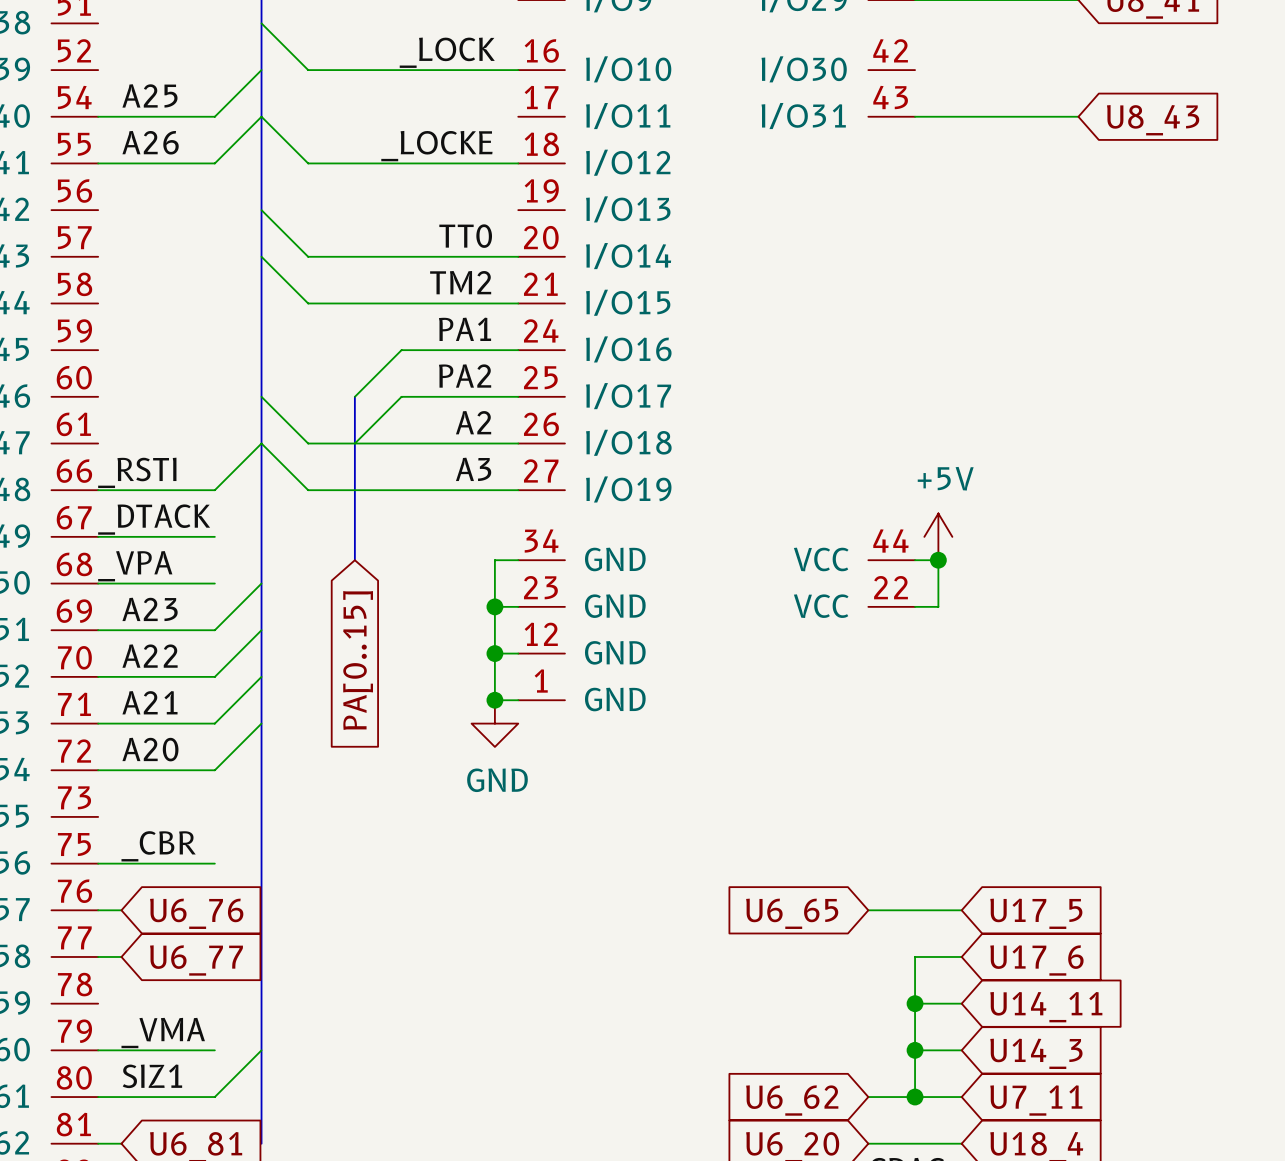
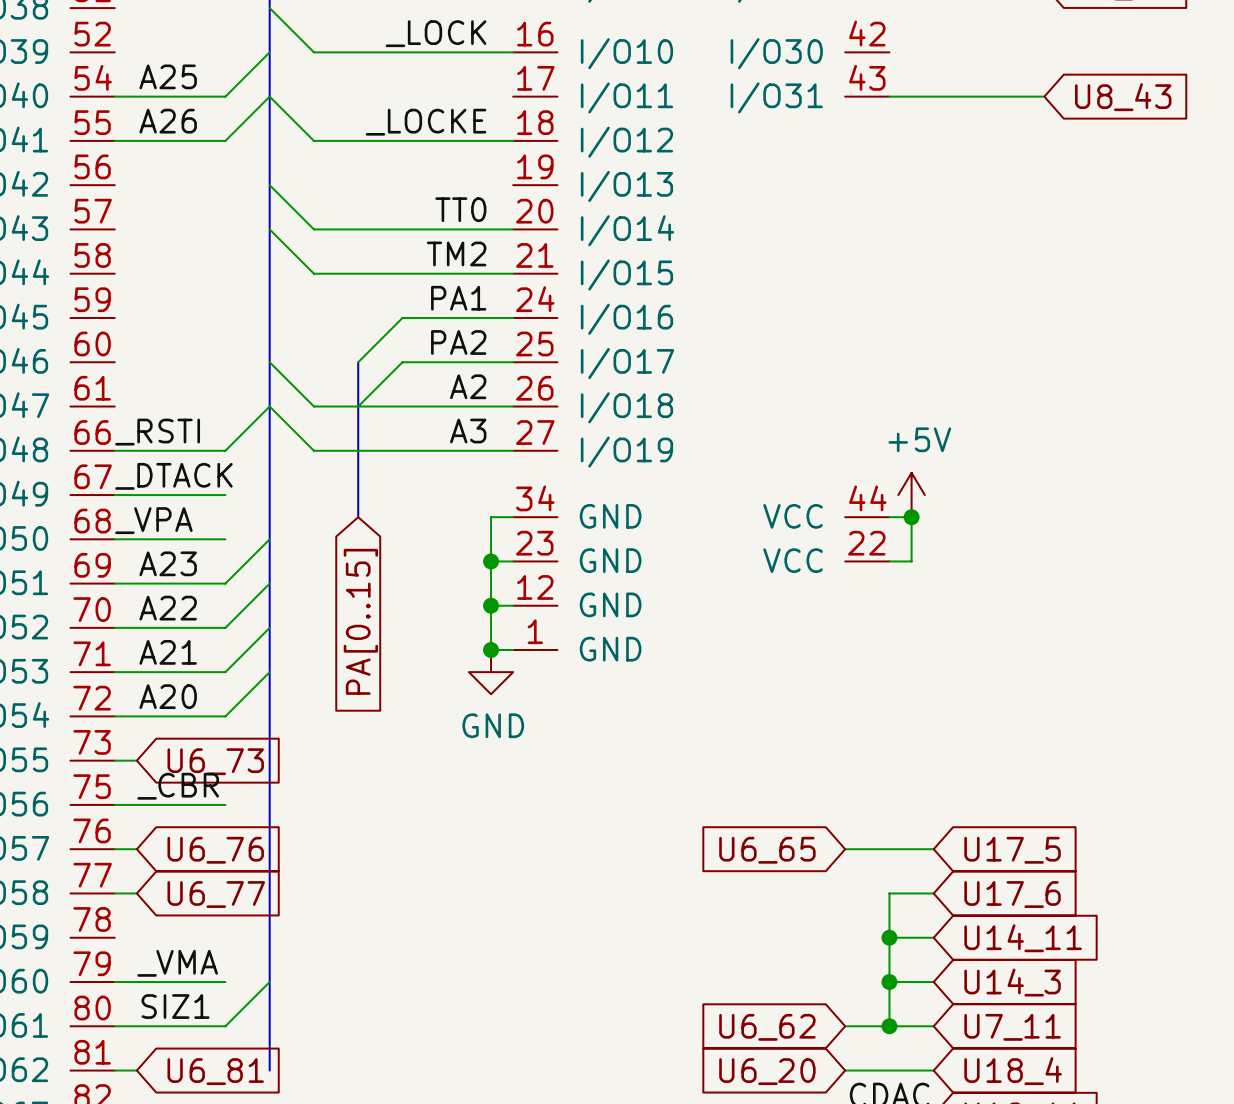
wire: none -> (114, 760) (136, 760)
global label: none -> U6_73 (215, 761)

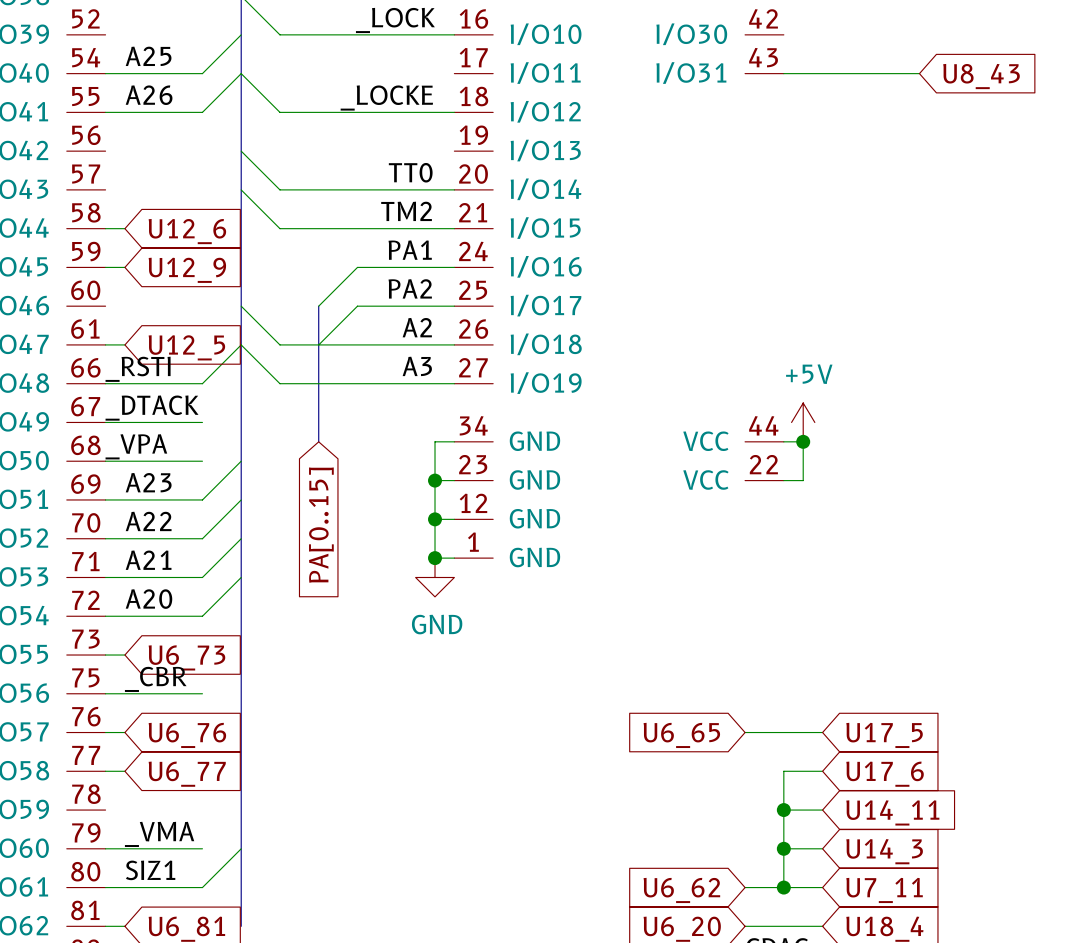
wire: none -> (105, 228) (124, 228)
global label: none -> U12_6 (187, 231)
wire: none -> (105, 267) (124, 267)
global label: none -> U12_9 (187, 270)
wire: none -> (105, 344) (124, 344)
global label: none -> U12_5 (186, 347)

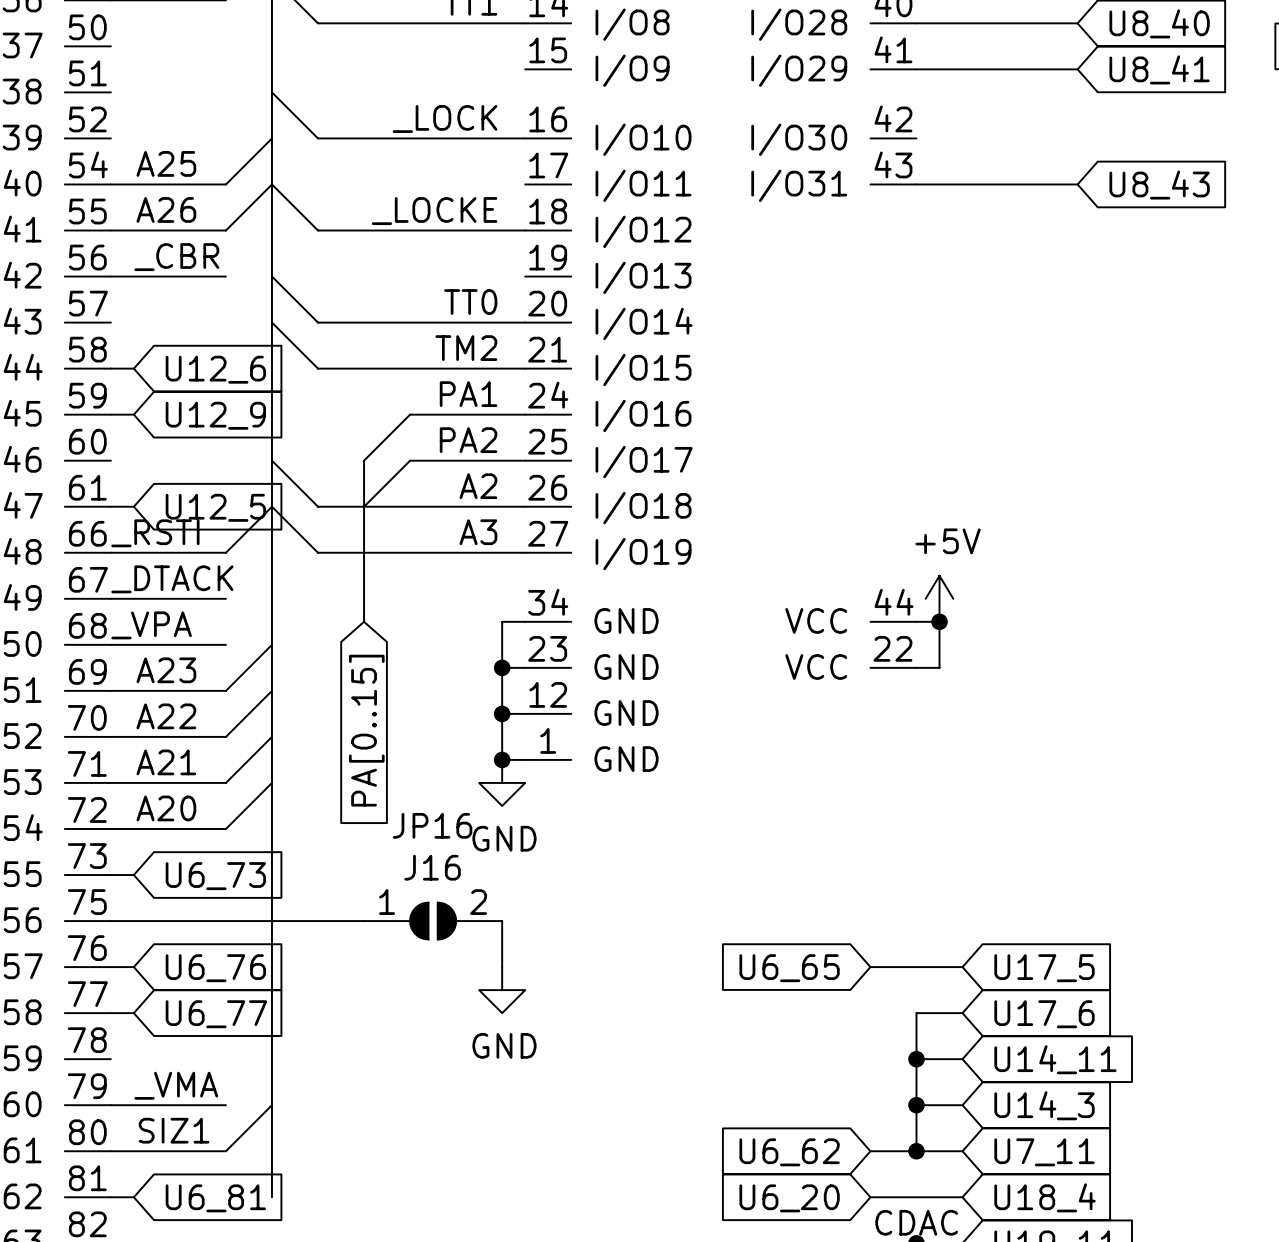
label: none -> _CBR (176, 257)
wire: none -> (110, 276) (225, 276)
label: _CBR (155, 679) -> none
wire: none -> (225, 921) (364, 921)
JP16: none -> J16 (433, 921)
wire: none -> (502, 921) (502, 967)
power symbol: none -> GND (502, 990)

